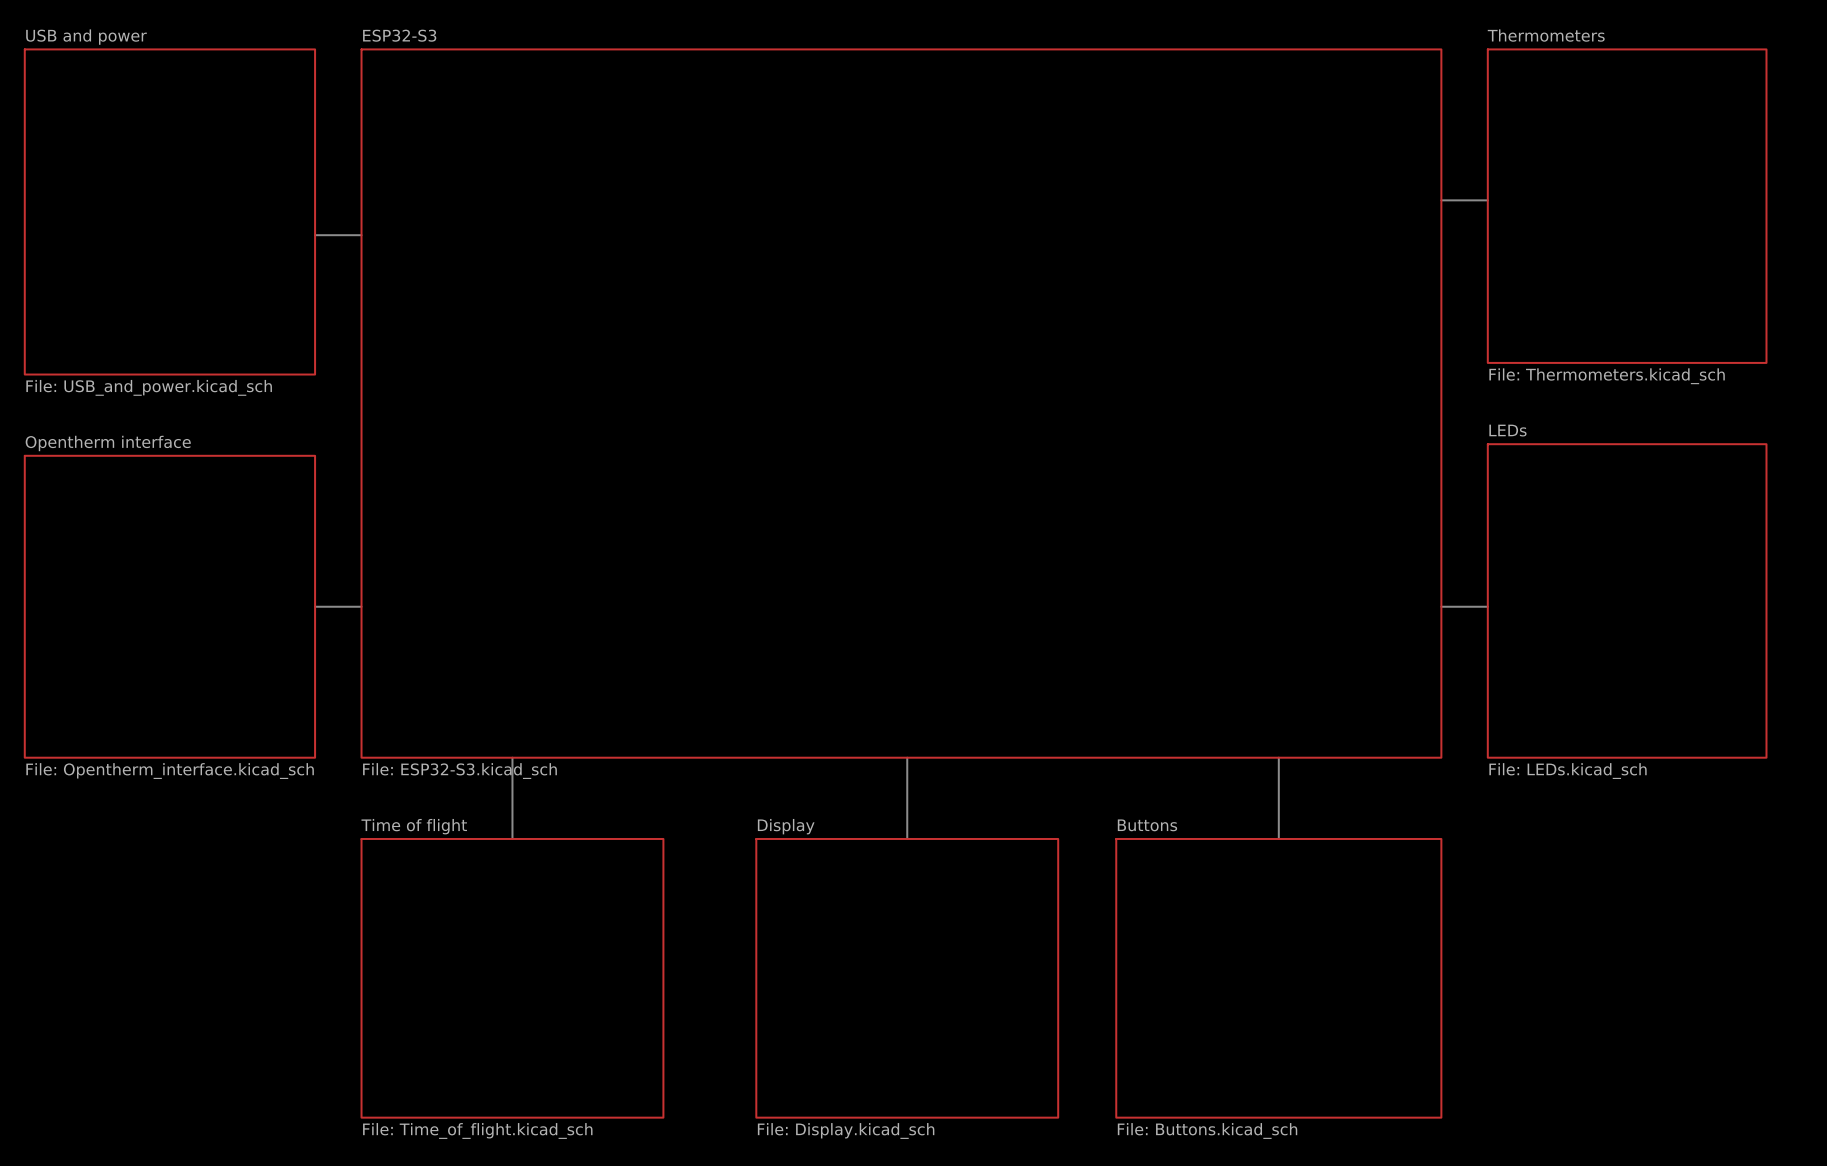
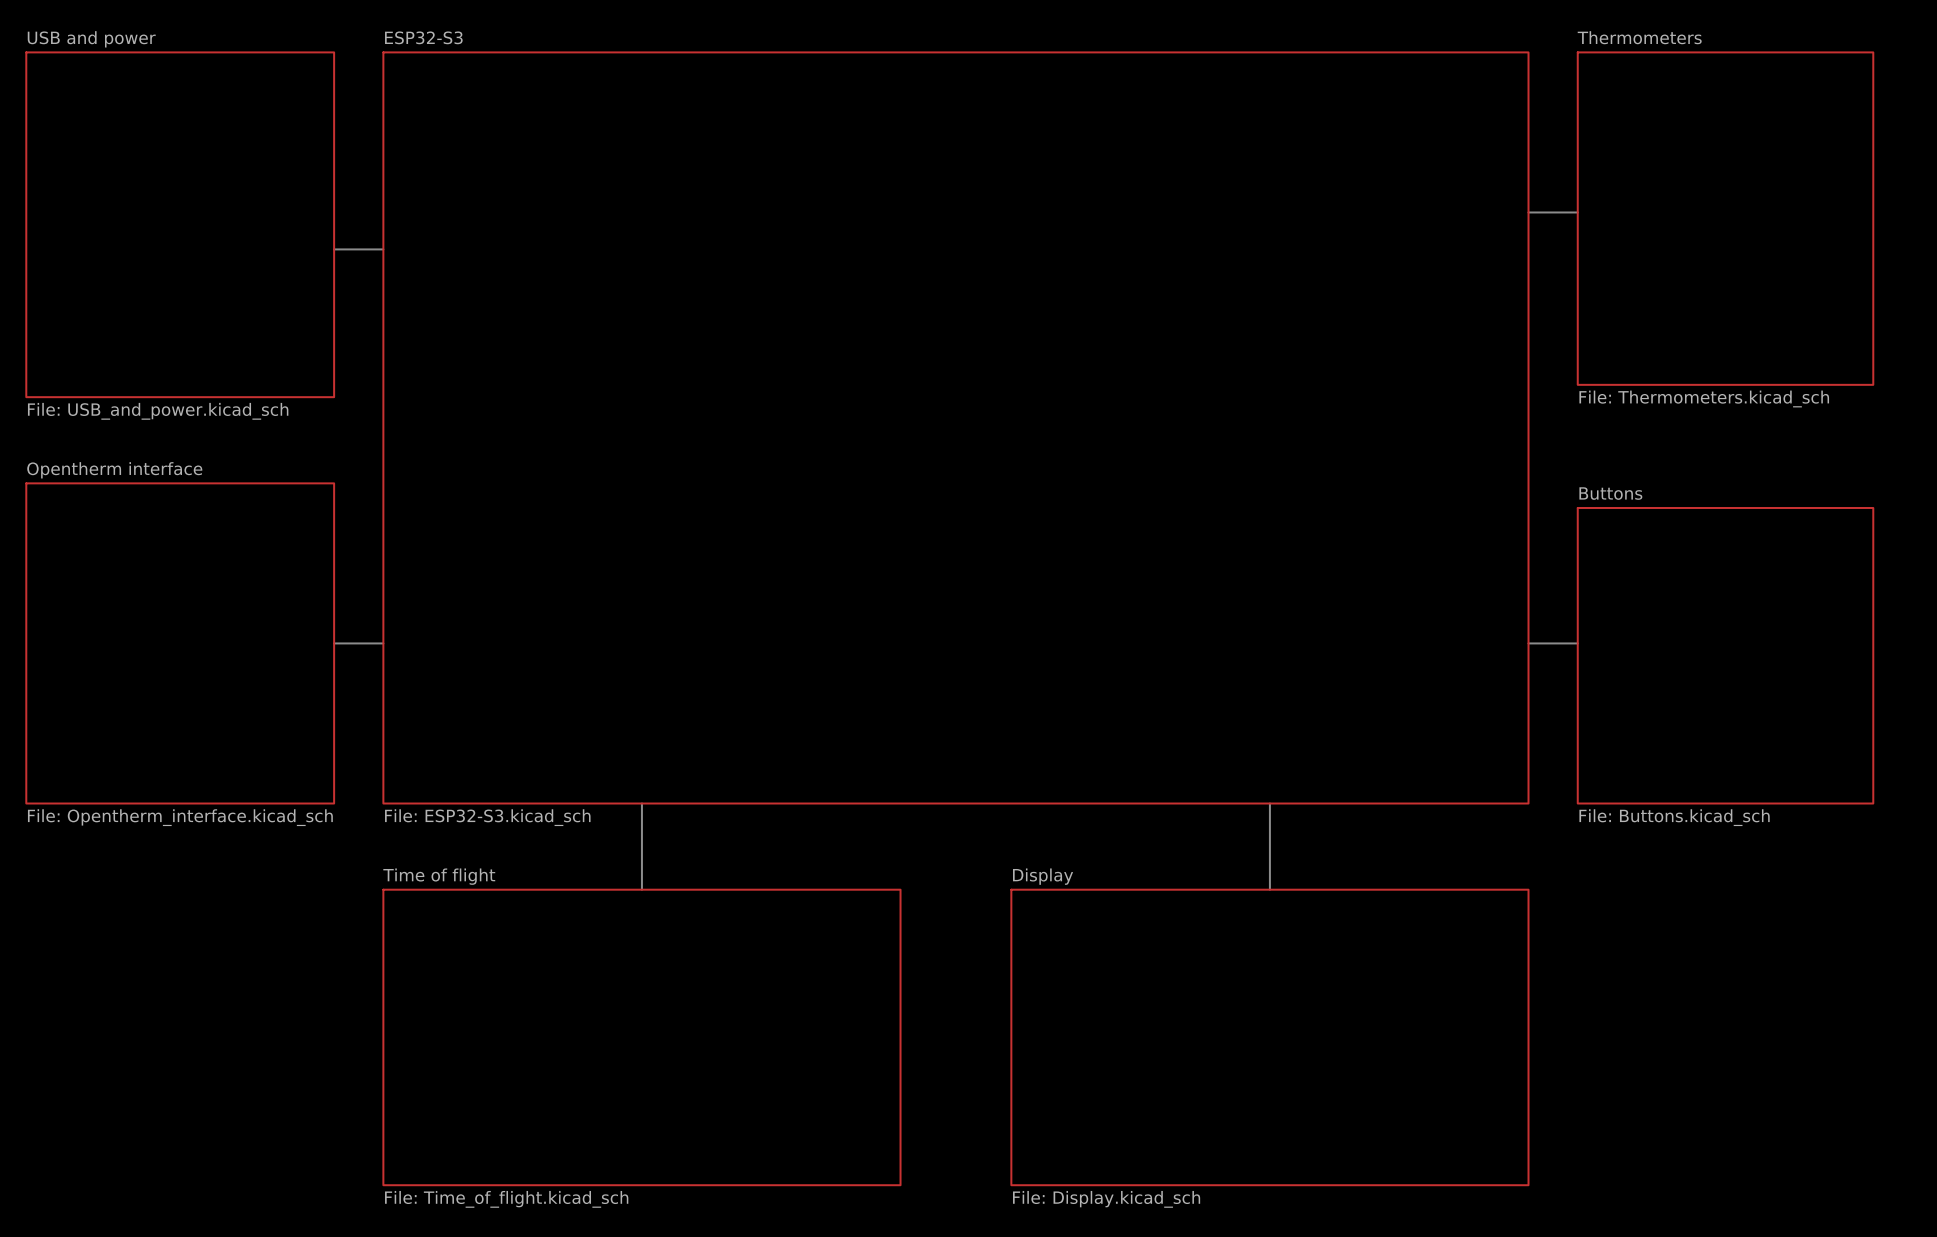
sheet LEDs: File: LEDs.kicad_sch (1627, 600) -> none
sheet Buttons: none -> File: Buttons.kicad_sch (1725, 655)
line: (512, 757) (512, 838) -> (641, 803) (641, 889)
line: (907, 757) (907, 838) -> none
line: (1278, 757) (1278, 838) -> (1269, 803) (1269, 889)
sheet Time of flight: File: Time_of_flight.kicad_sch (512, 978) -> none
sheet Time of flight: none -> File: Time_of_flight.kicad_sch (641, 1037)
sheet Display: File: Display.kicad_sch (907, 978) -> none
sheet Display: none -> File: Display.kicad_sch (1269, 1037)
sheet Buttons: File: Buttons.kicad_sch (1278, 978) -> none

